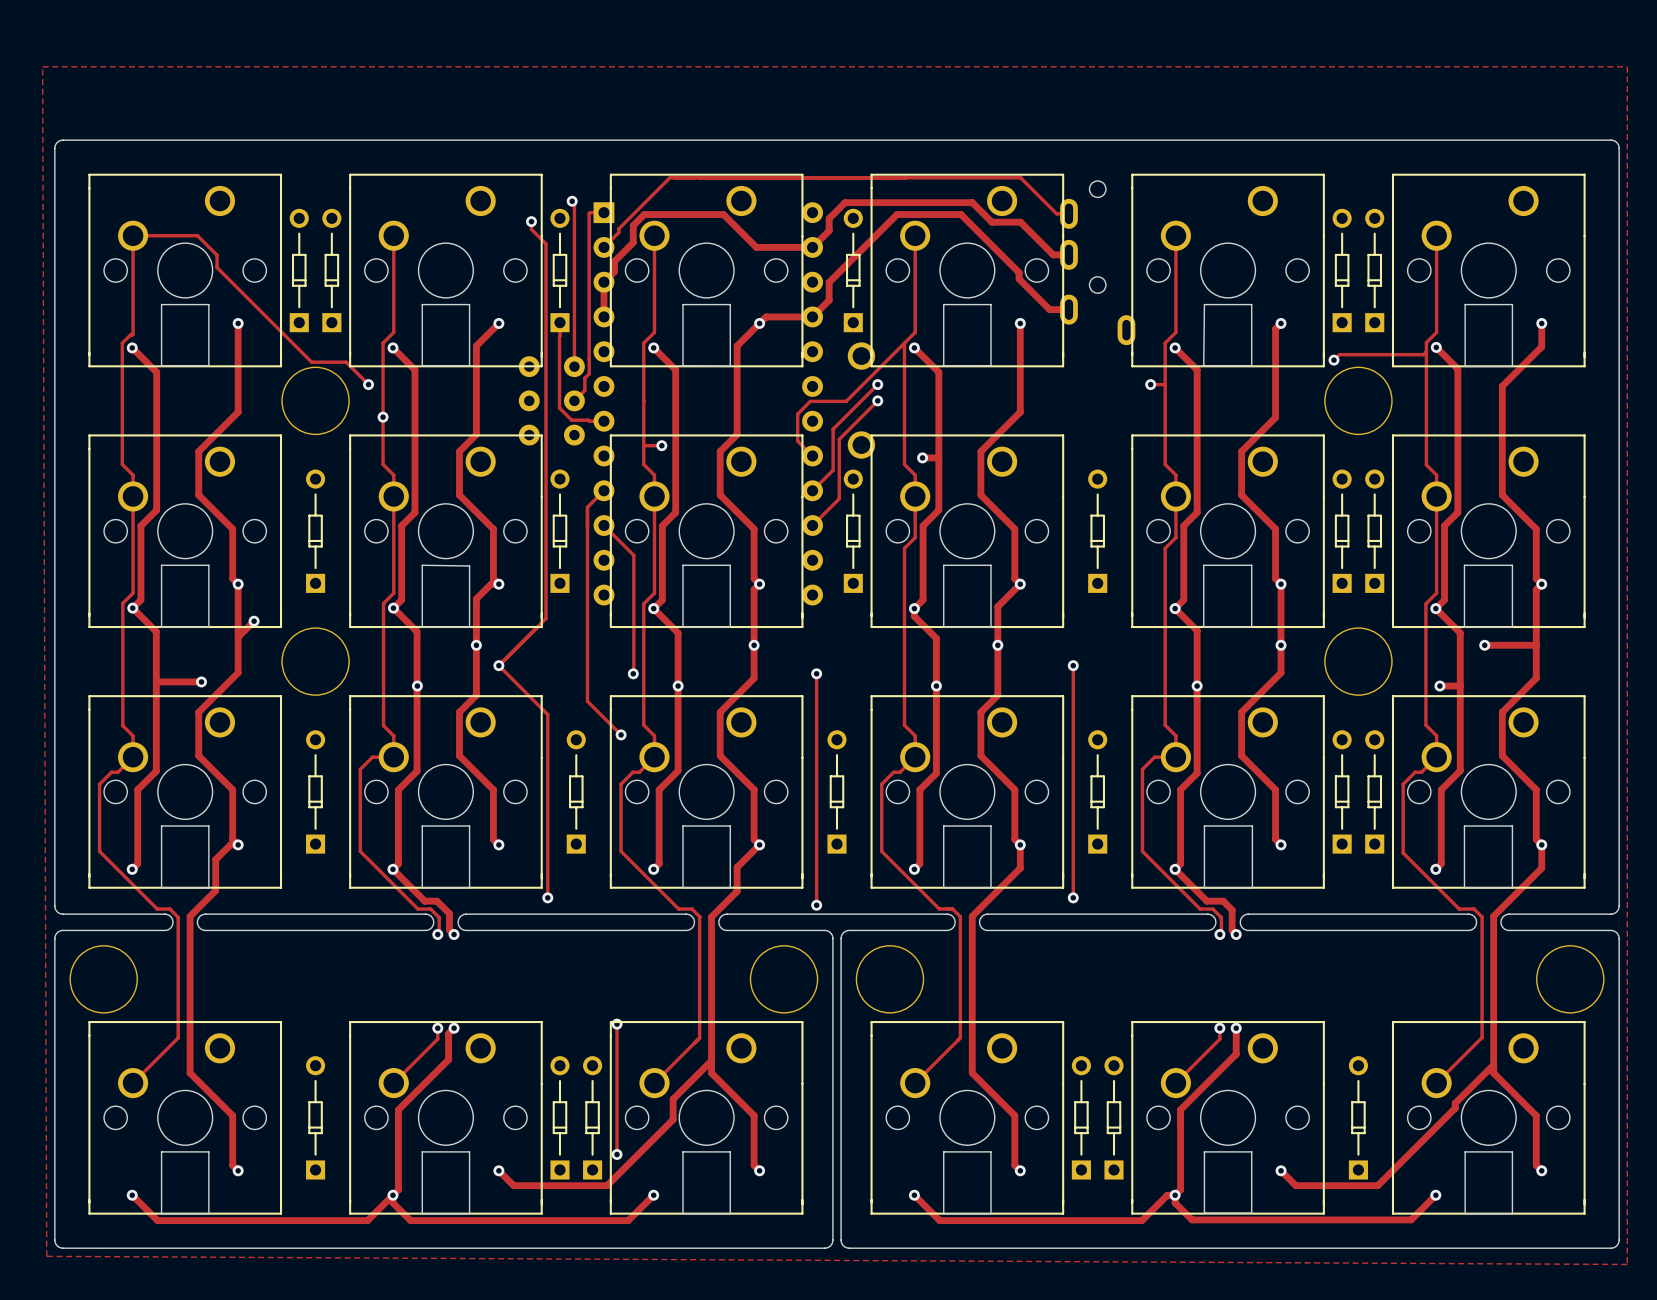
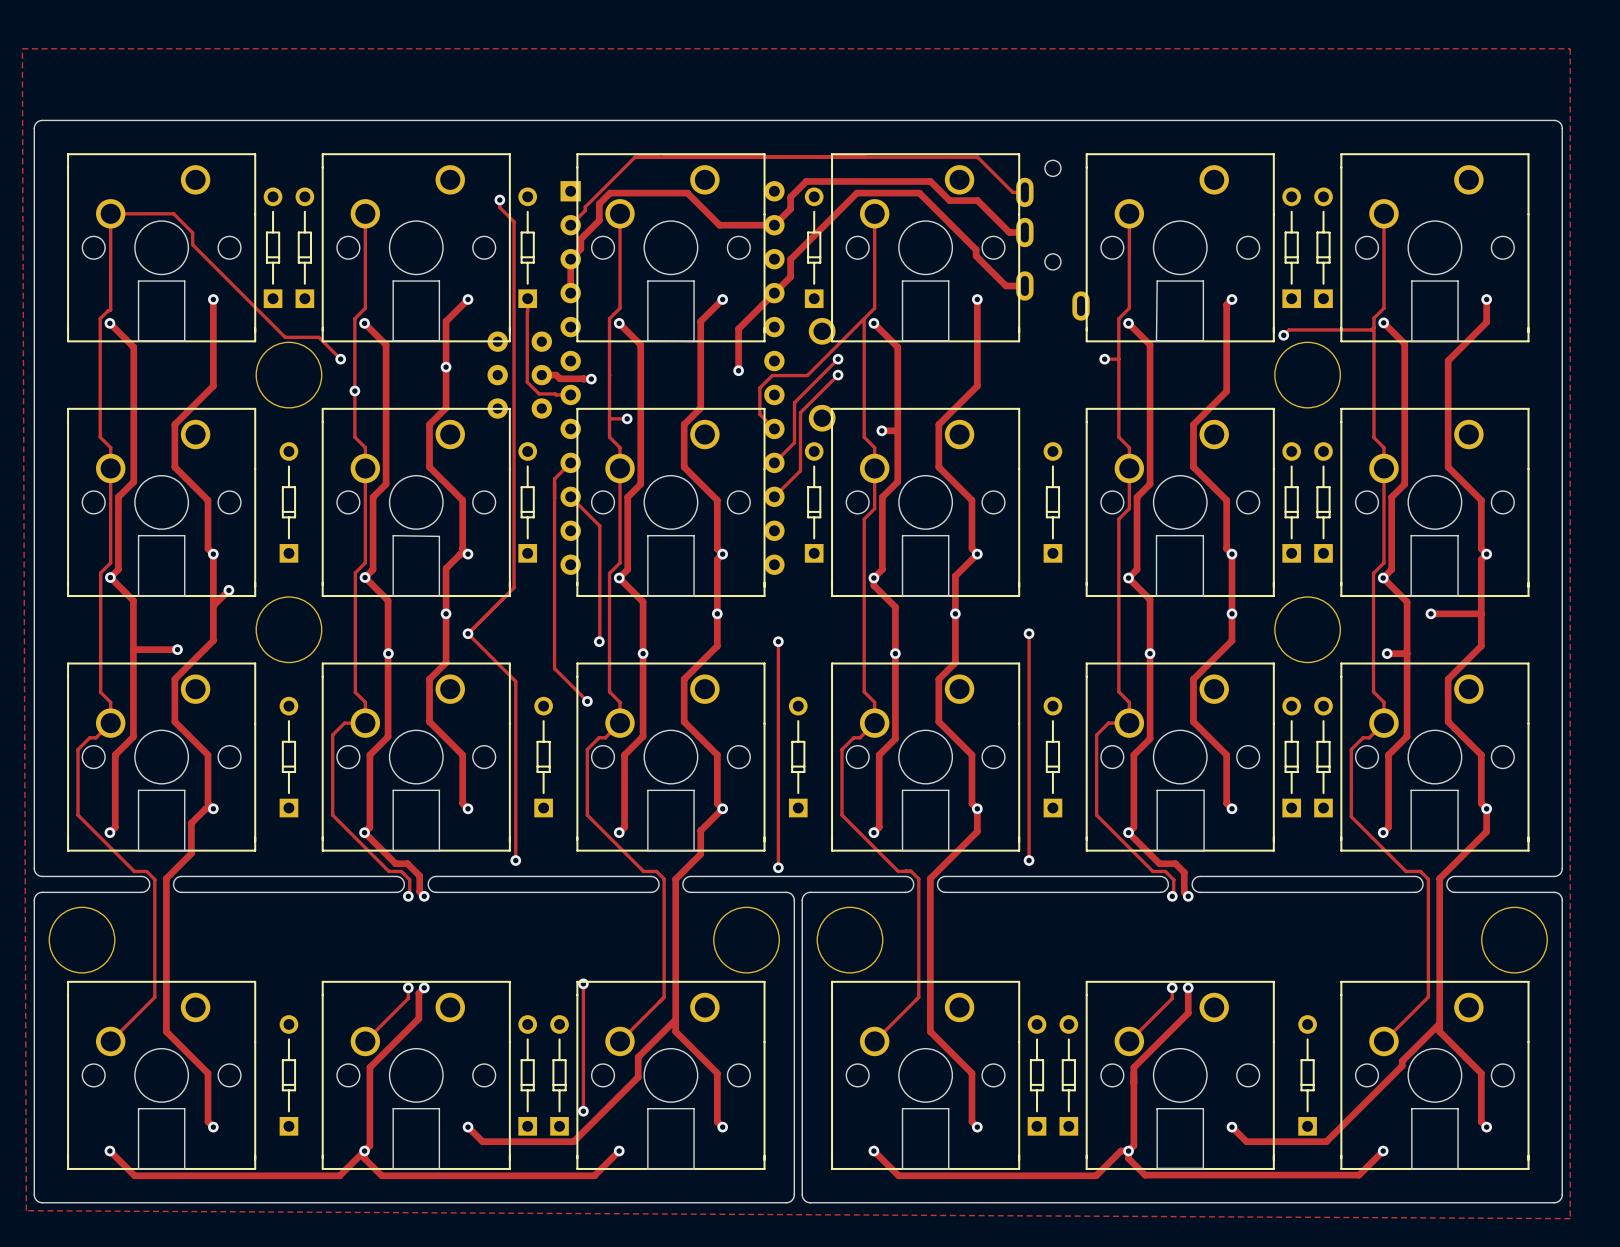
track: (572, 201) (574, 203) (574, 366) -> none
via: (572, 201) -> none
track: (603, 212) (589, 213) (589, 359) -> none
track: (812, 316) (766, 316) (759, 323) -> (774, 293) (738, 328) (738, 370)
track: (589, 359) (589, 373) (584, 378) (584, 390) (574, 400) -> (591, 379) (559, 378) (556, 375) (541, 375)
via: none -> (446, 367)
via: none -> (738, 370)
via: none -> (591, 379)

